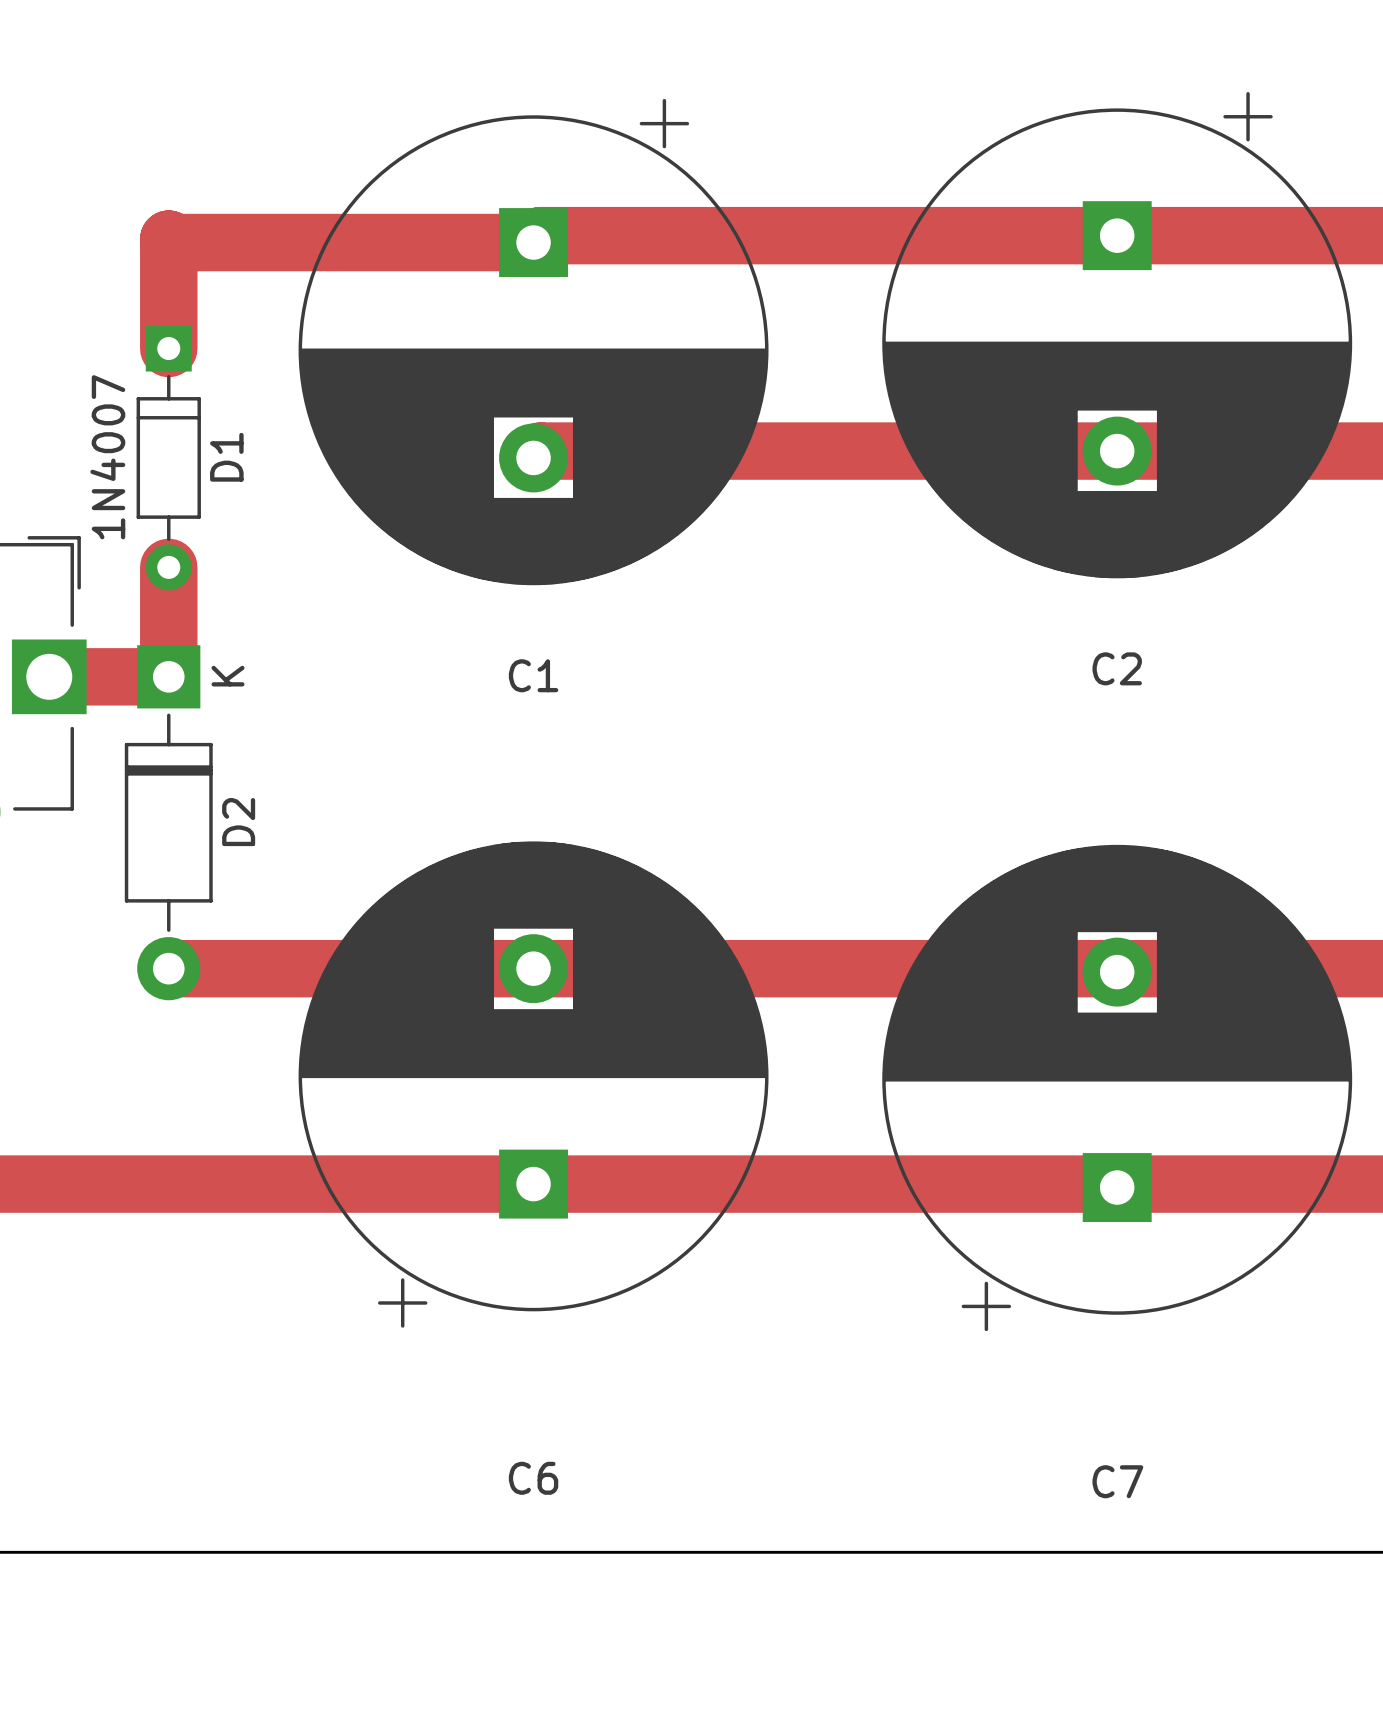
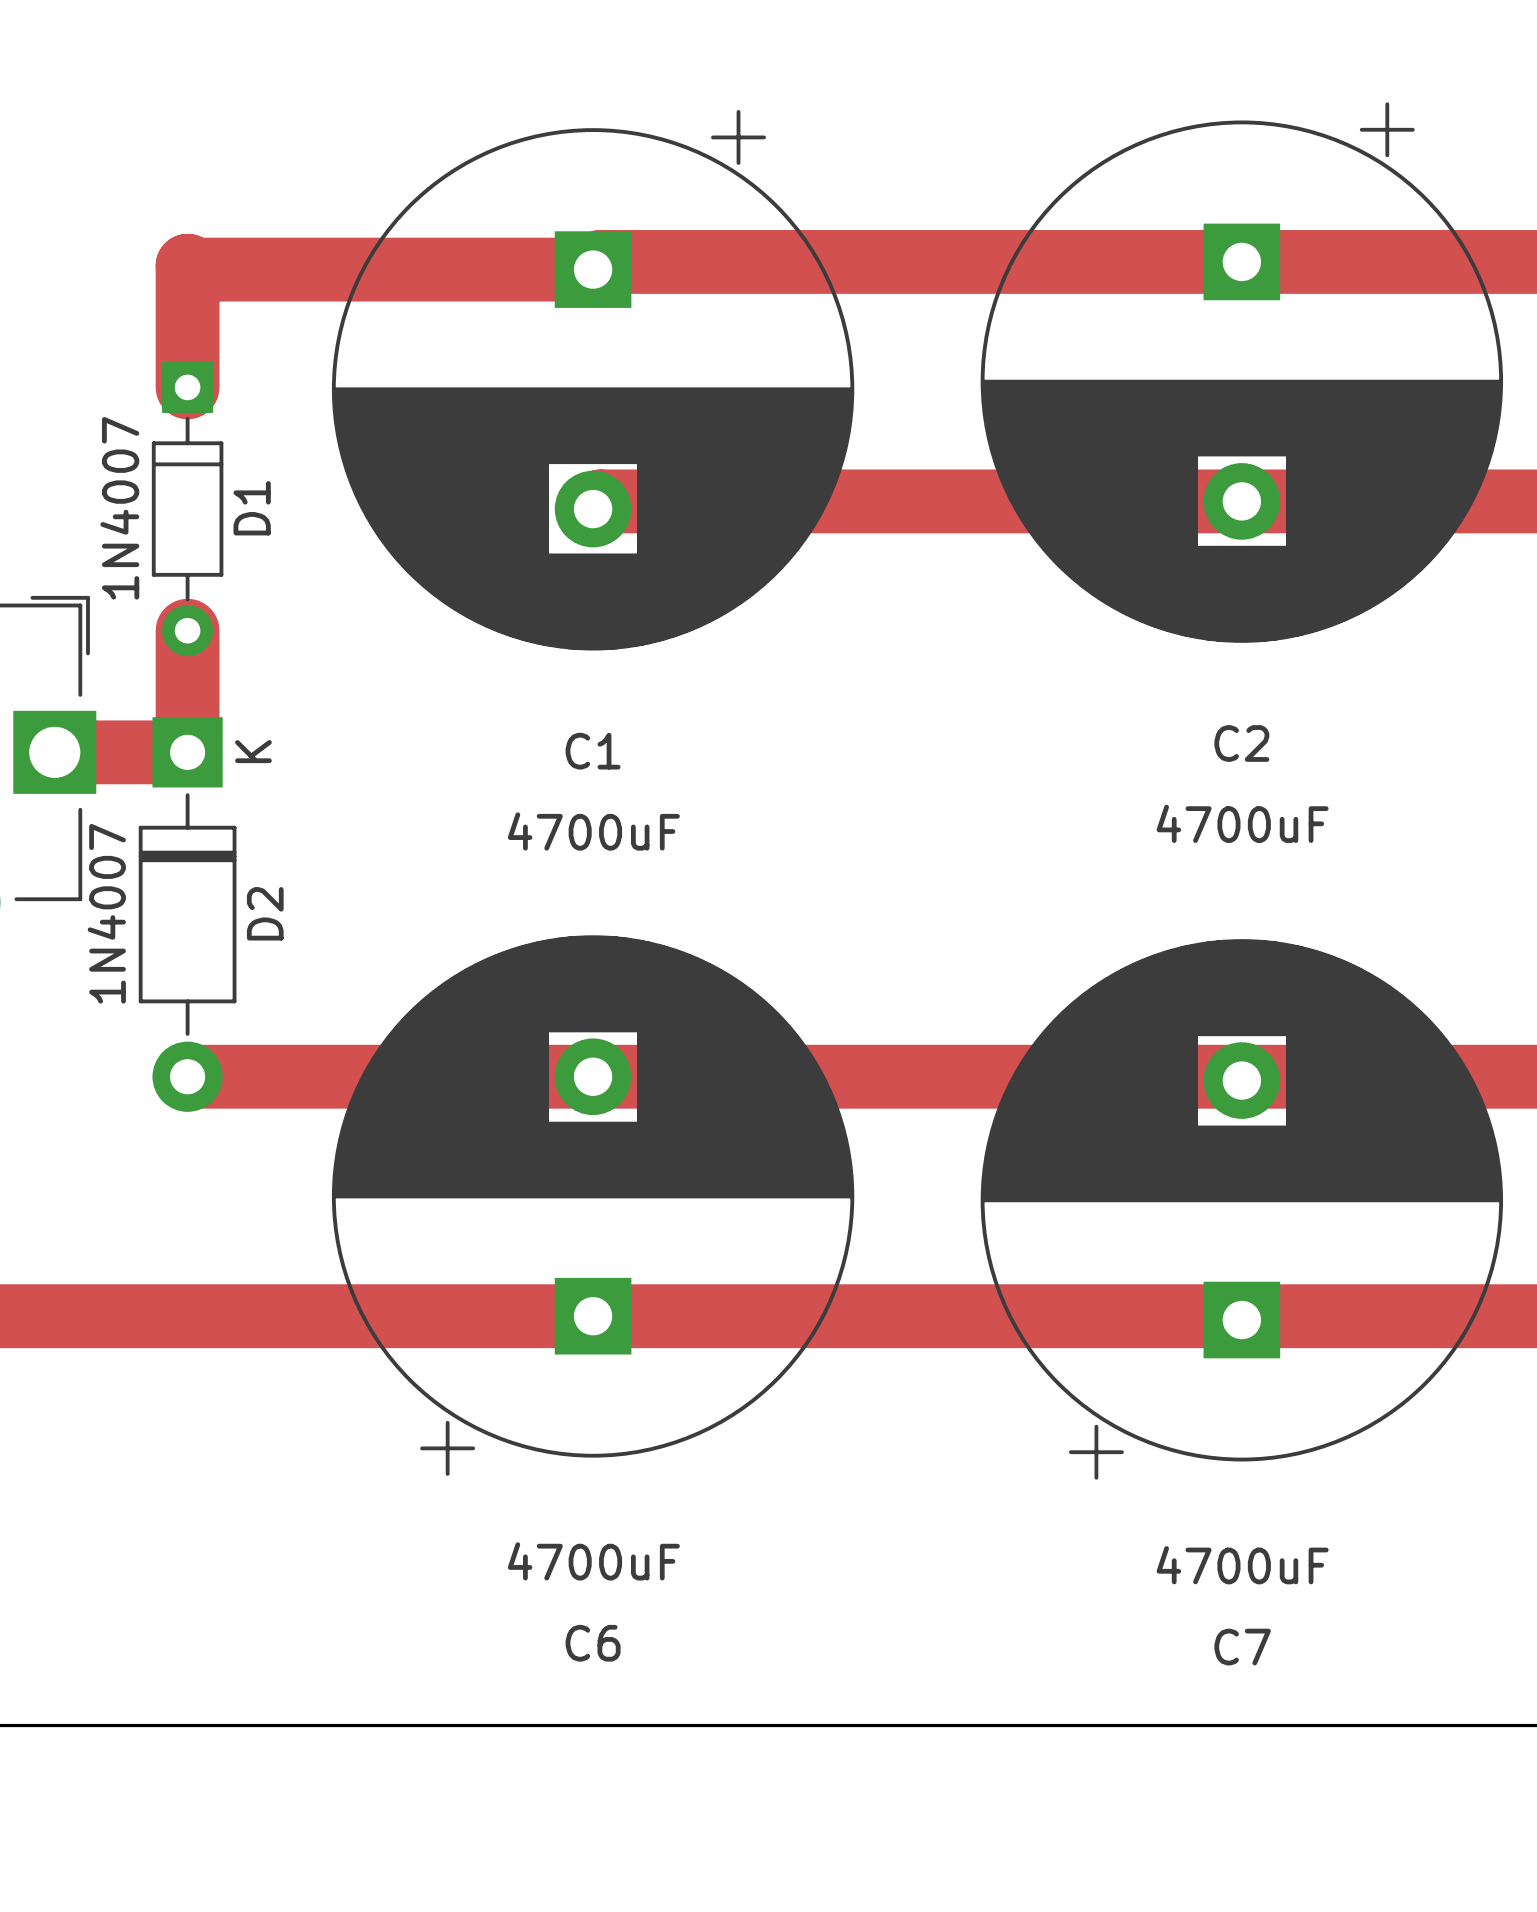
C2 value: none -> 4700uF (1242, 823)
C1 value: none -> 4700uF (593, 831)
D2 value: none -> 1N4007 (106, 913)
C6 value: none -> 4700uF (593, 1561)
C7 value: none -> 4700uF (1242, 1565)

